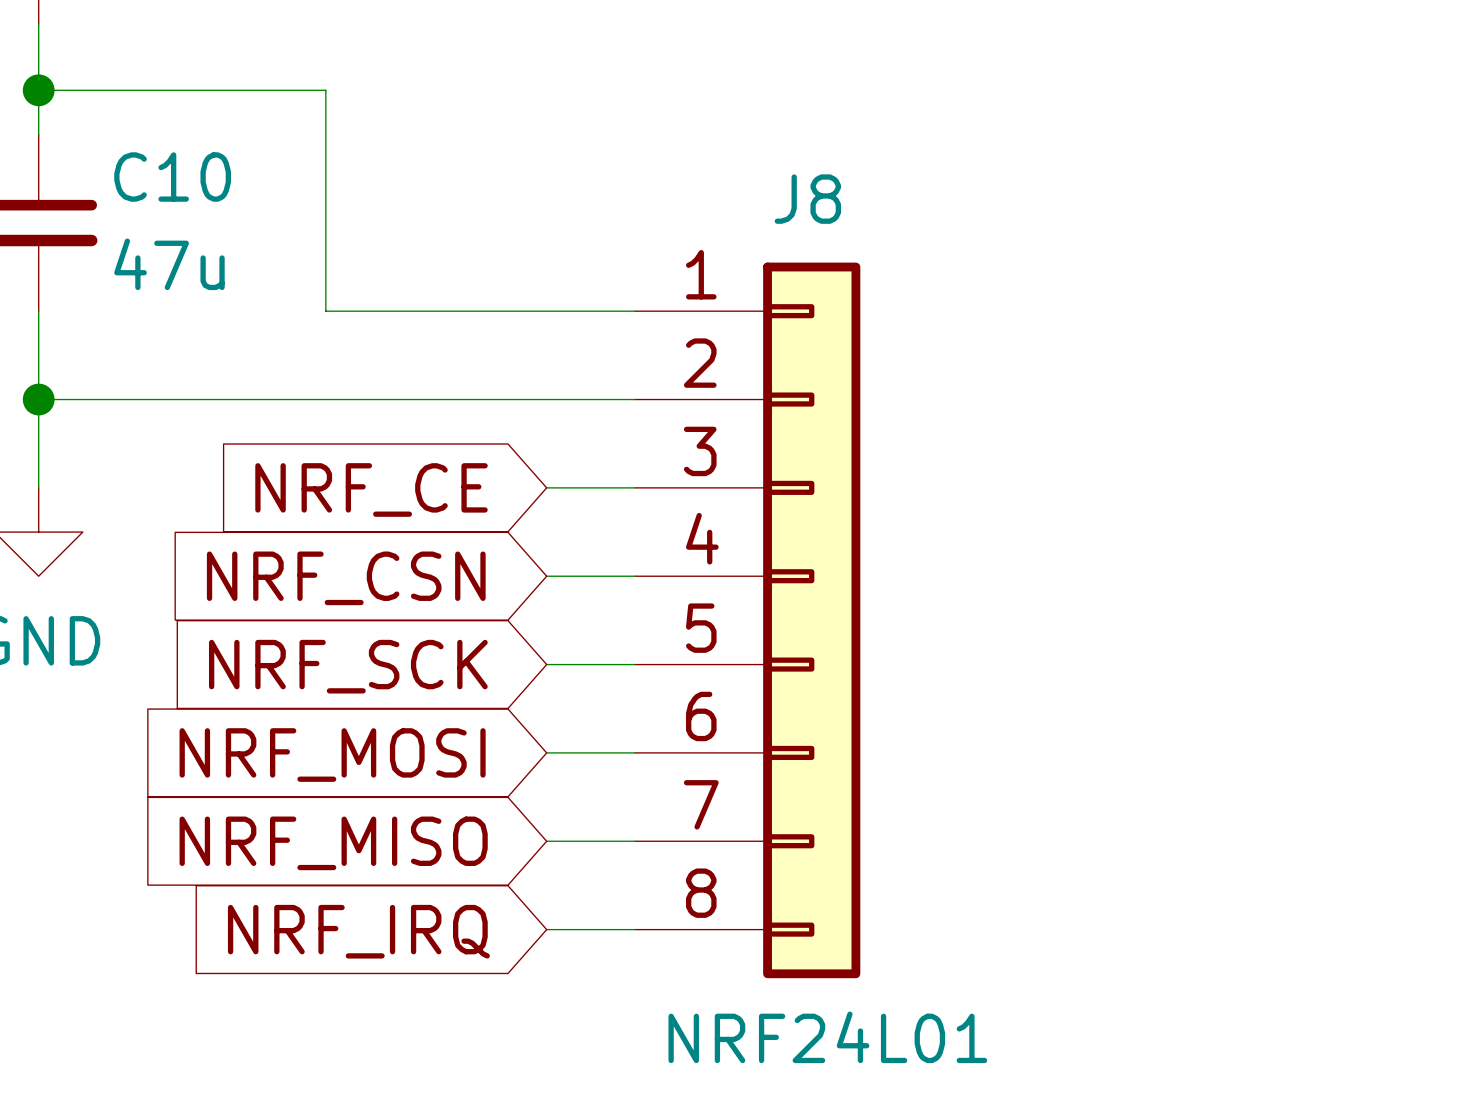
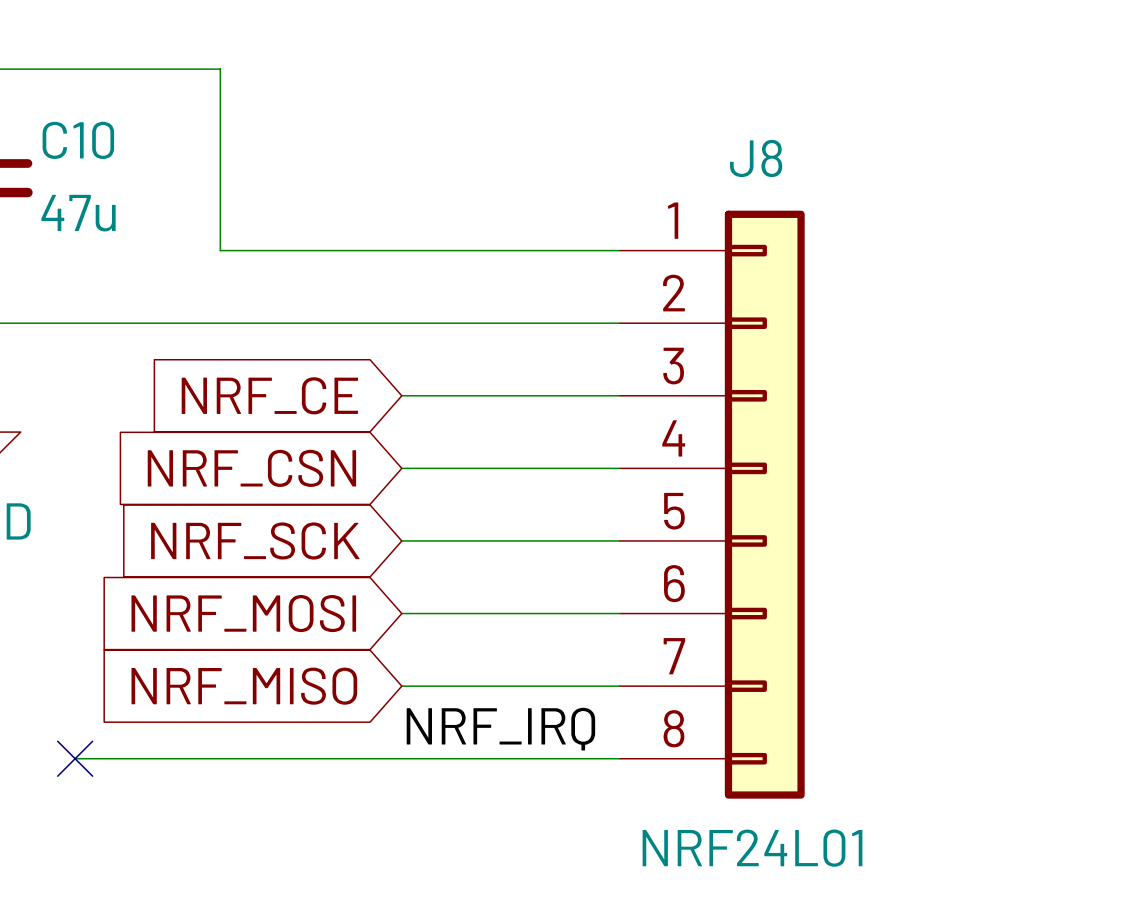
J8 position: (747, 620) -> (712, 504)
label: none -> NRF_IRQ (500, 729)
wire: none -> (75, 758) (401, 758)
no-connect mark: none -> (75, 758)
global label: NRF_IRQ (358, 931) -> none

